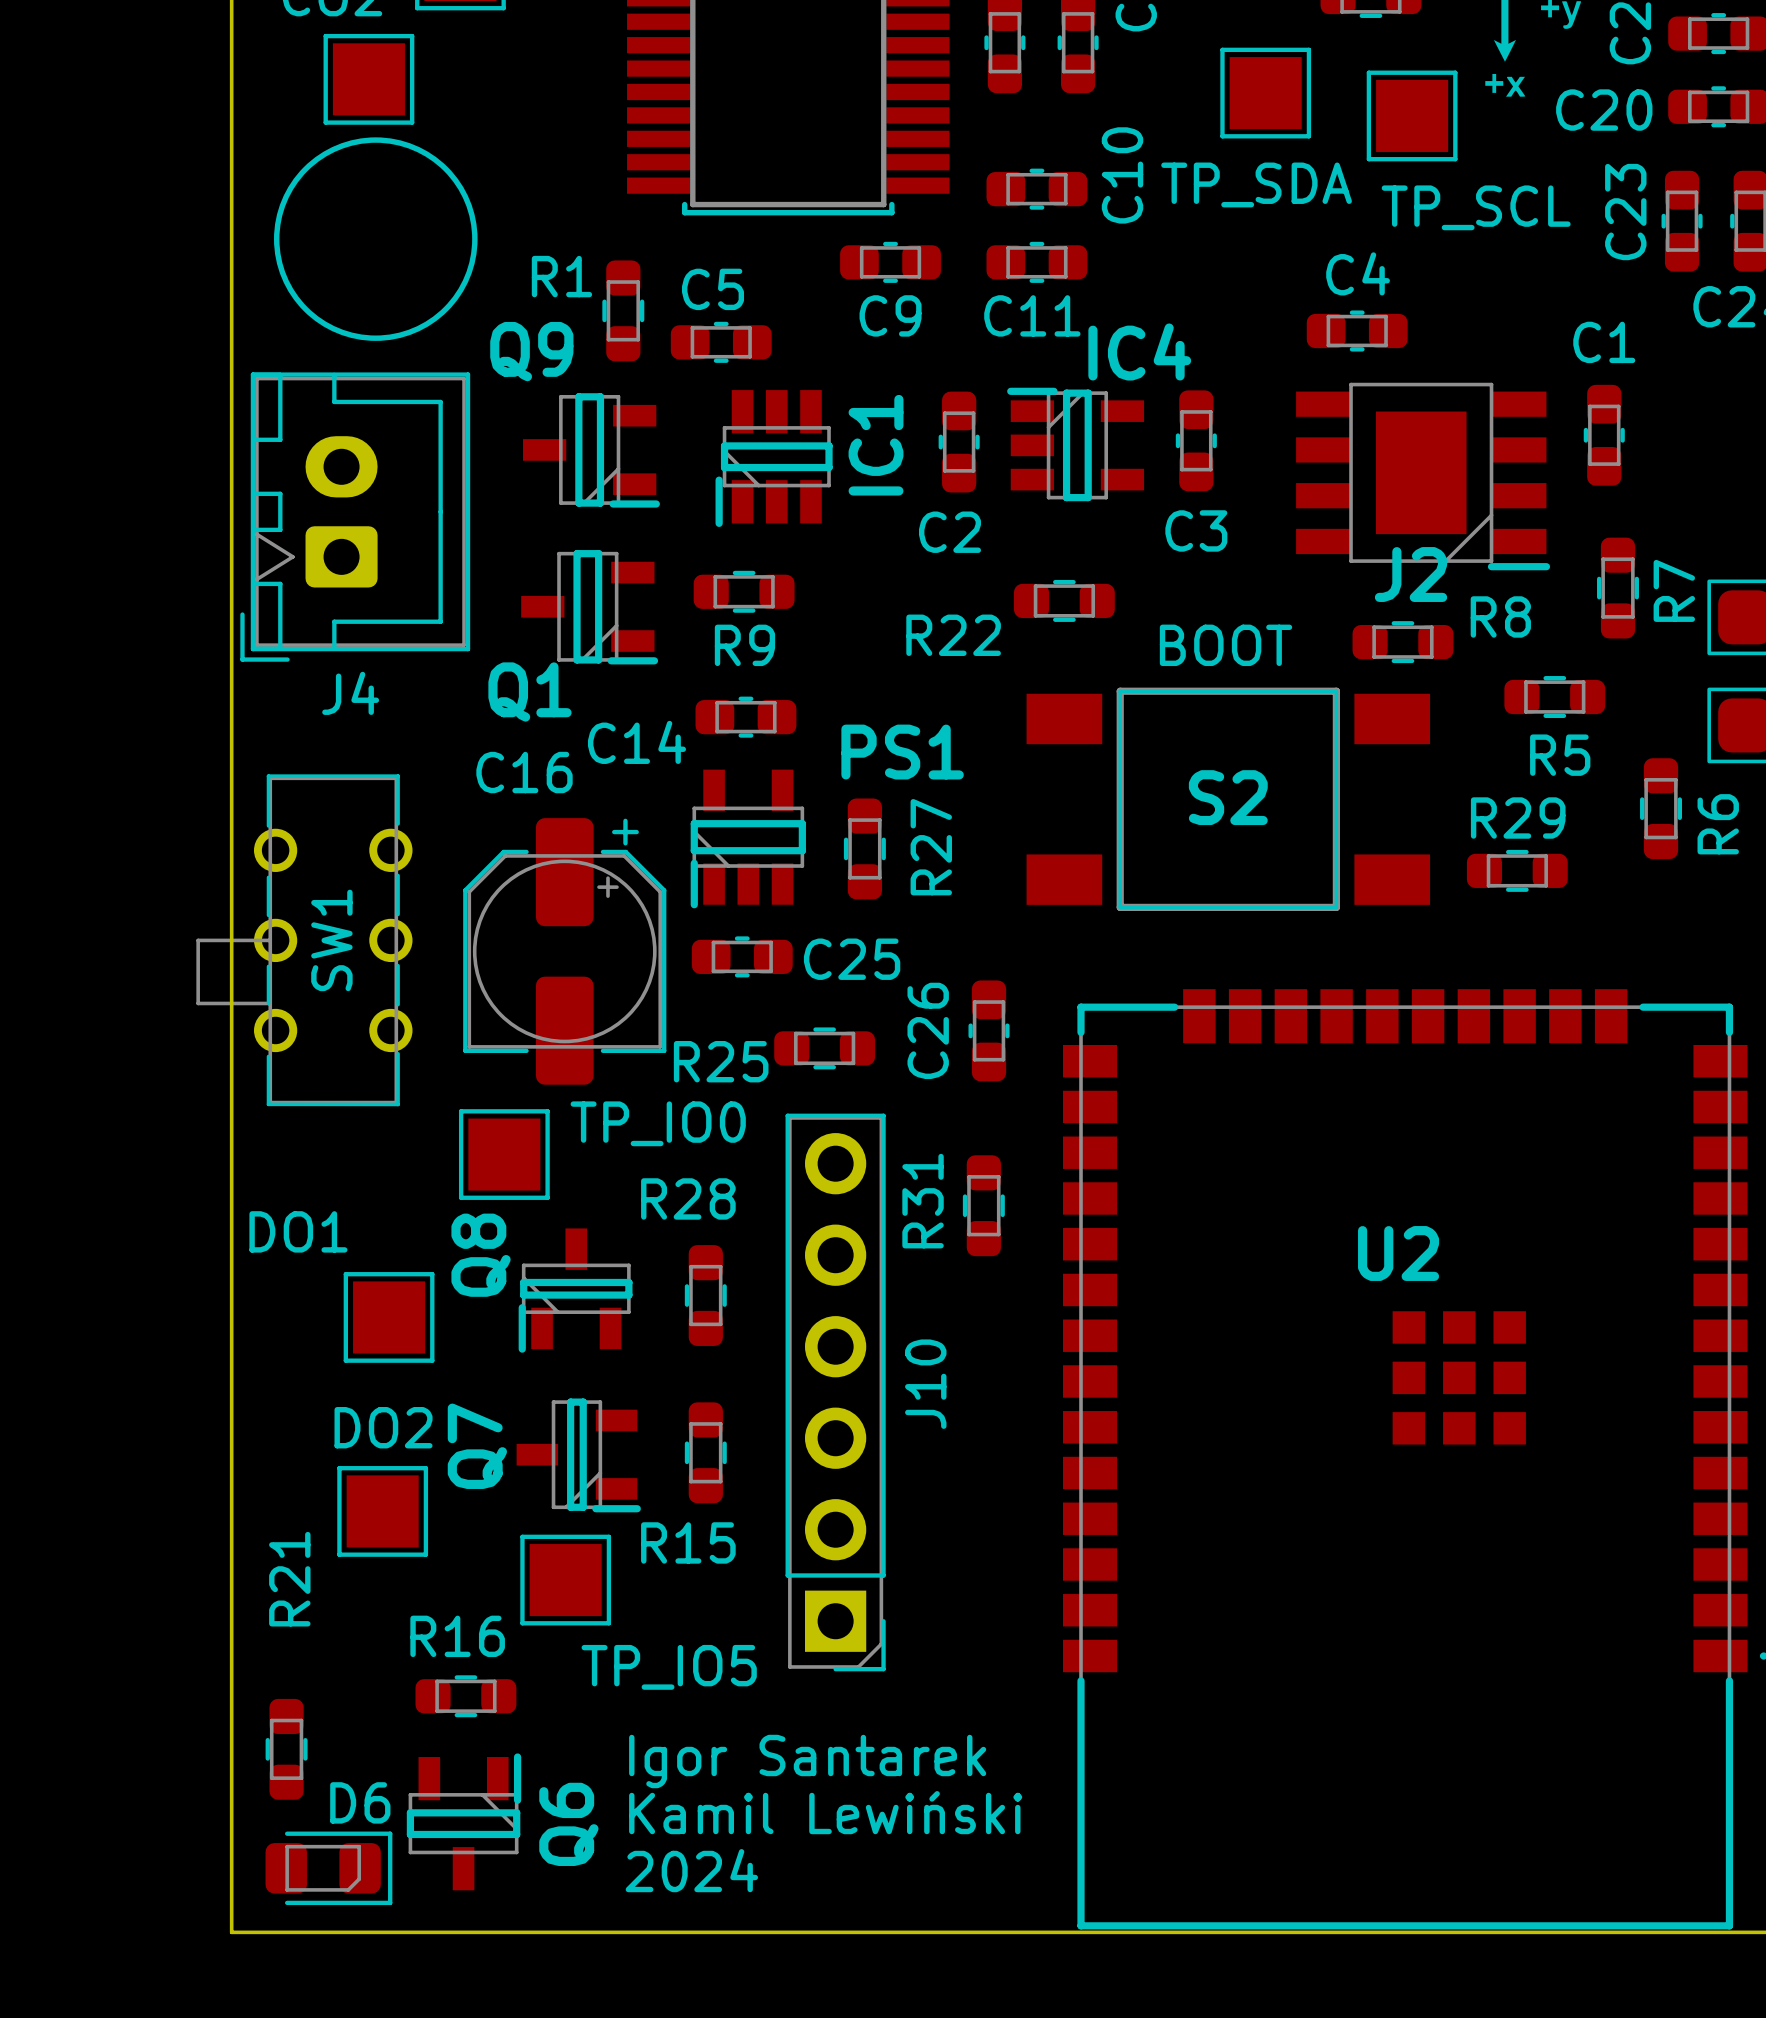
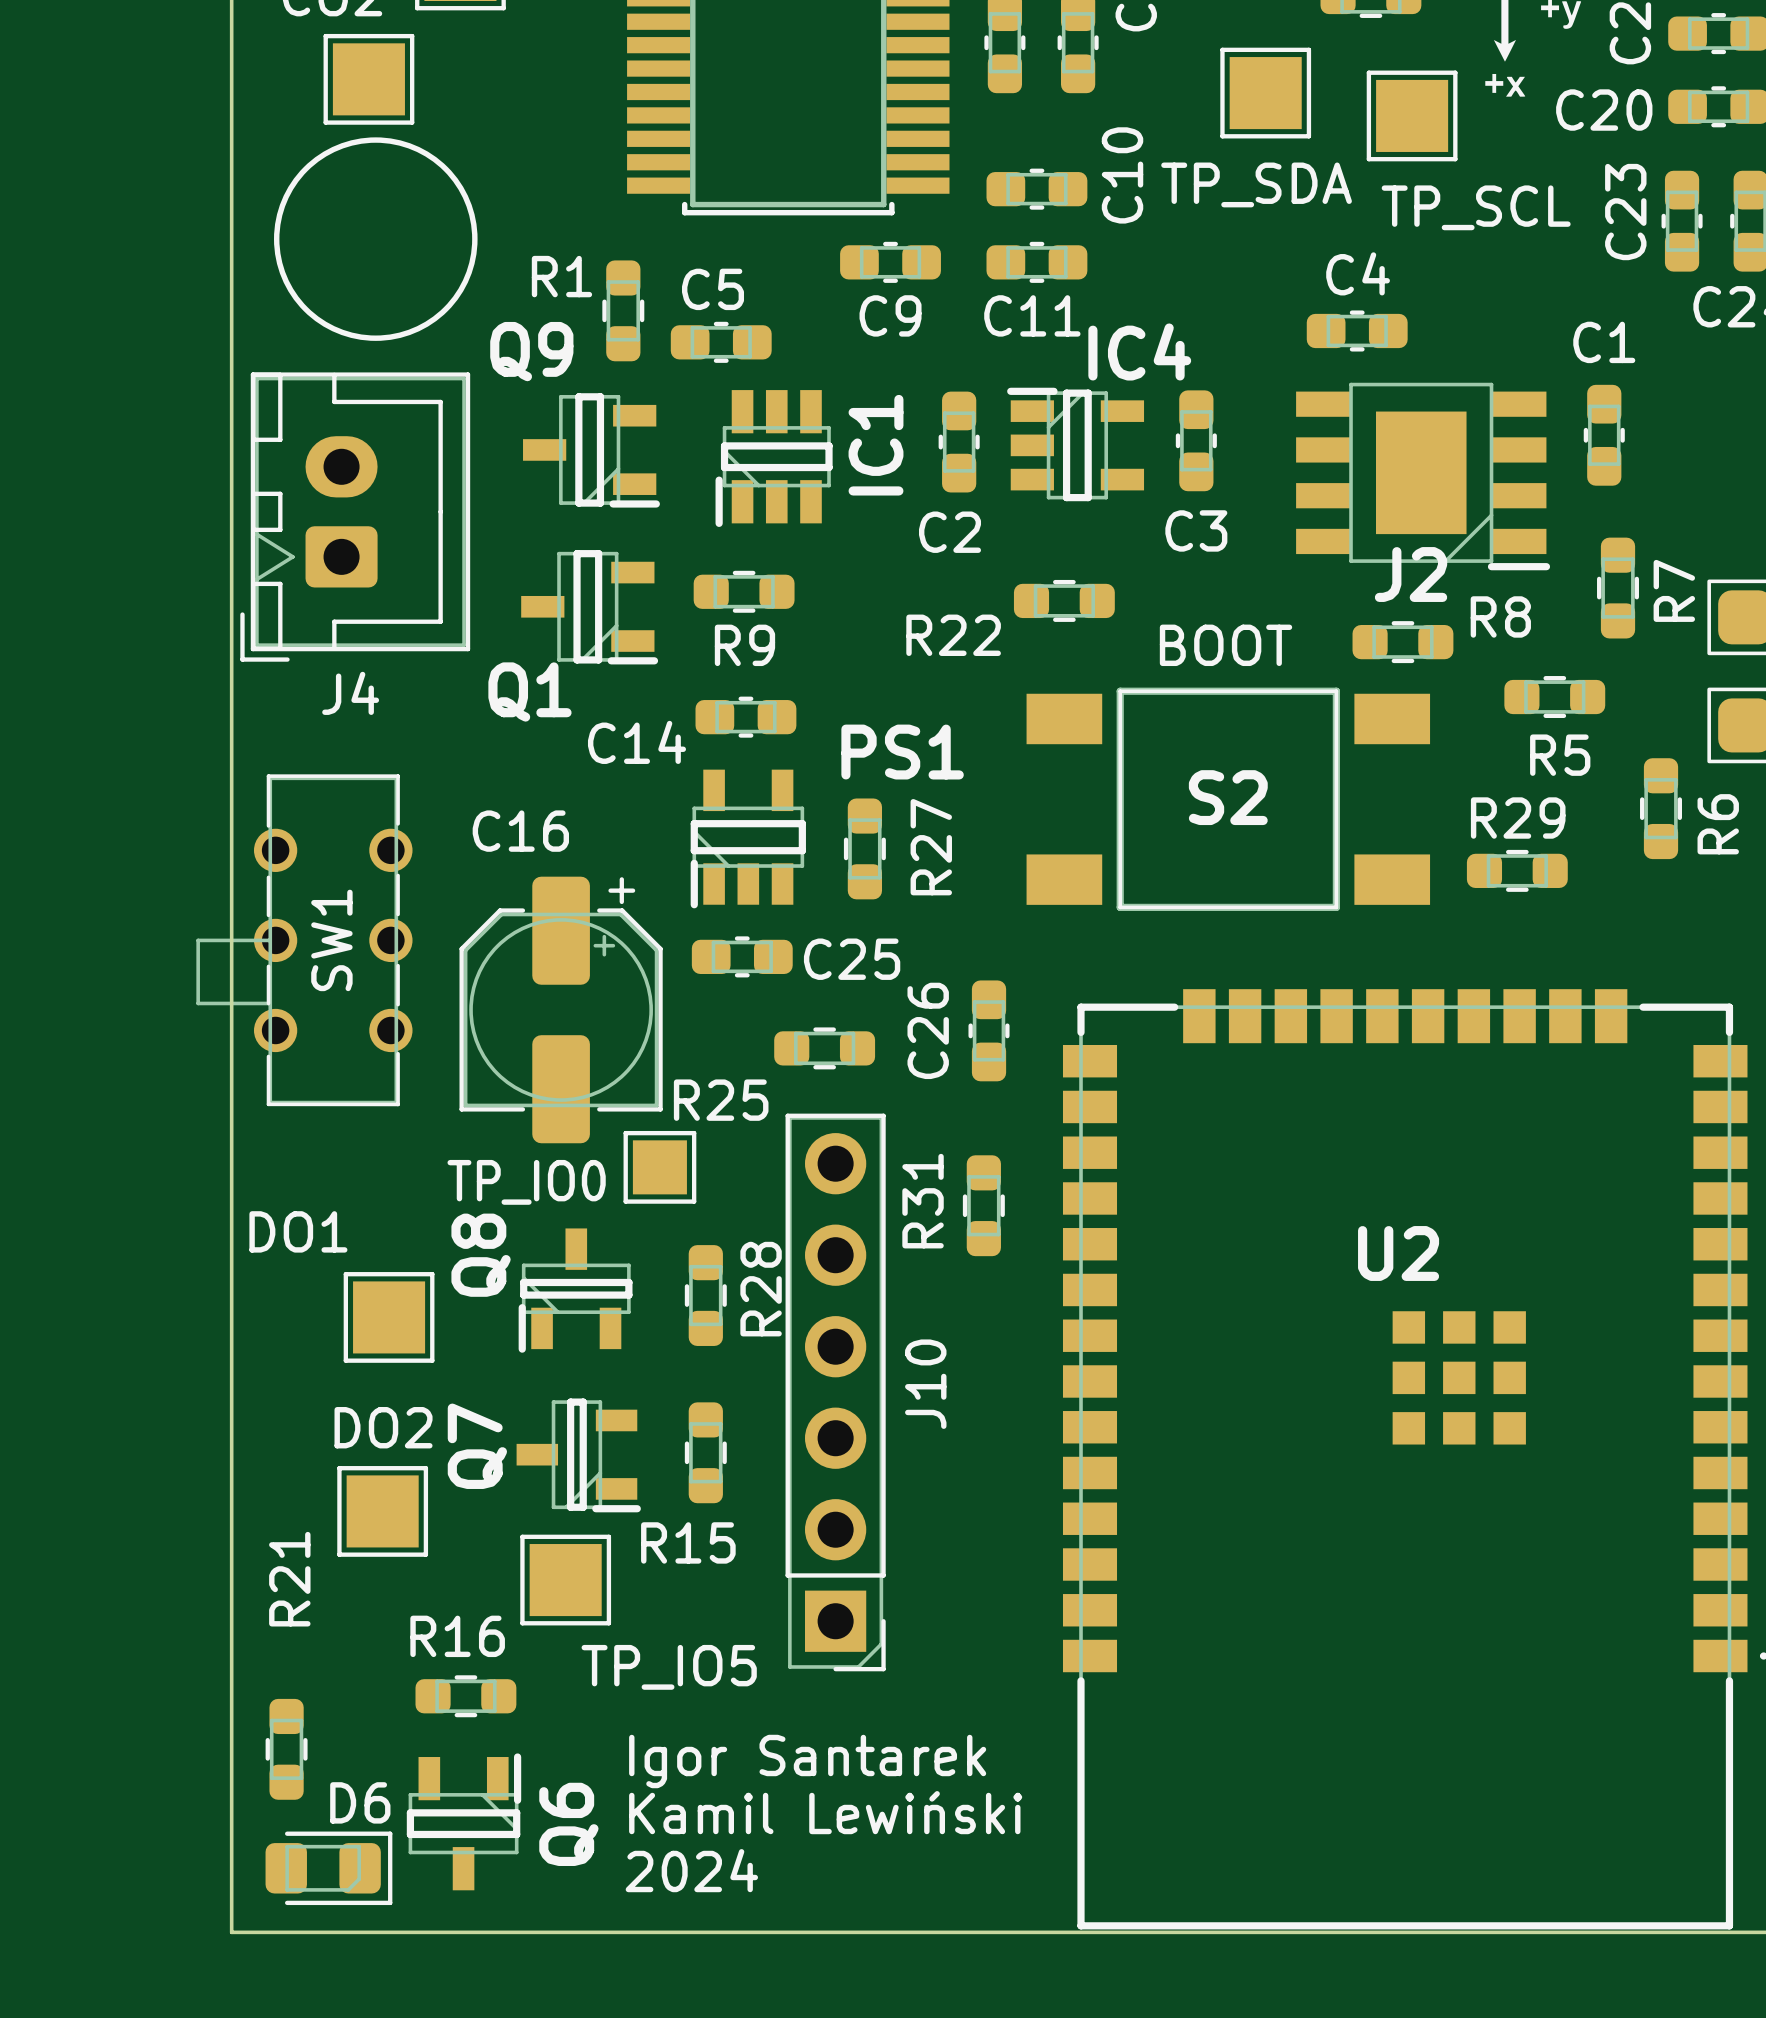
C16 position: (564, 951) -> (561, 1009)
R25 name position: R25 (721, 1061) -> R25 (721, 1100)
part: TP_IO0 (504, 1154) -> none
part: none -> TP_IO0 (659, 1167)
R28 name rotation: 0° (688, 1198) -> 90° counterclockwise (761, 1289)

